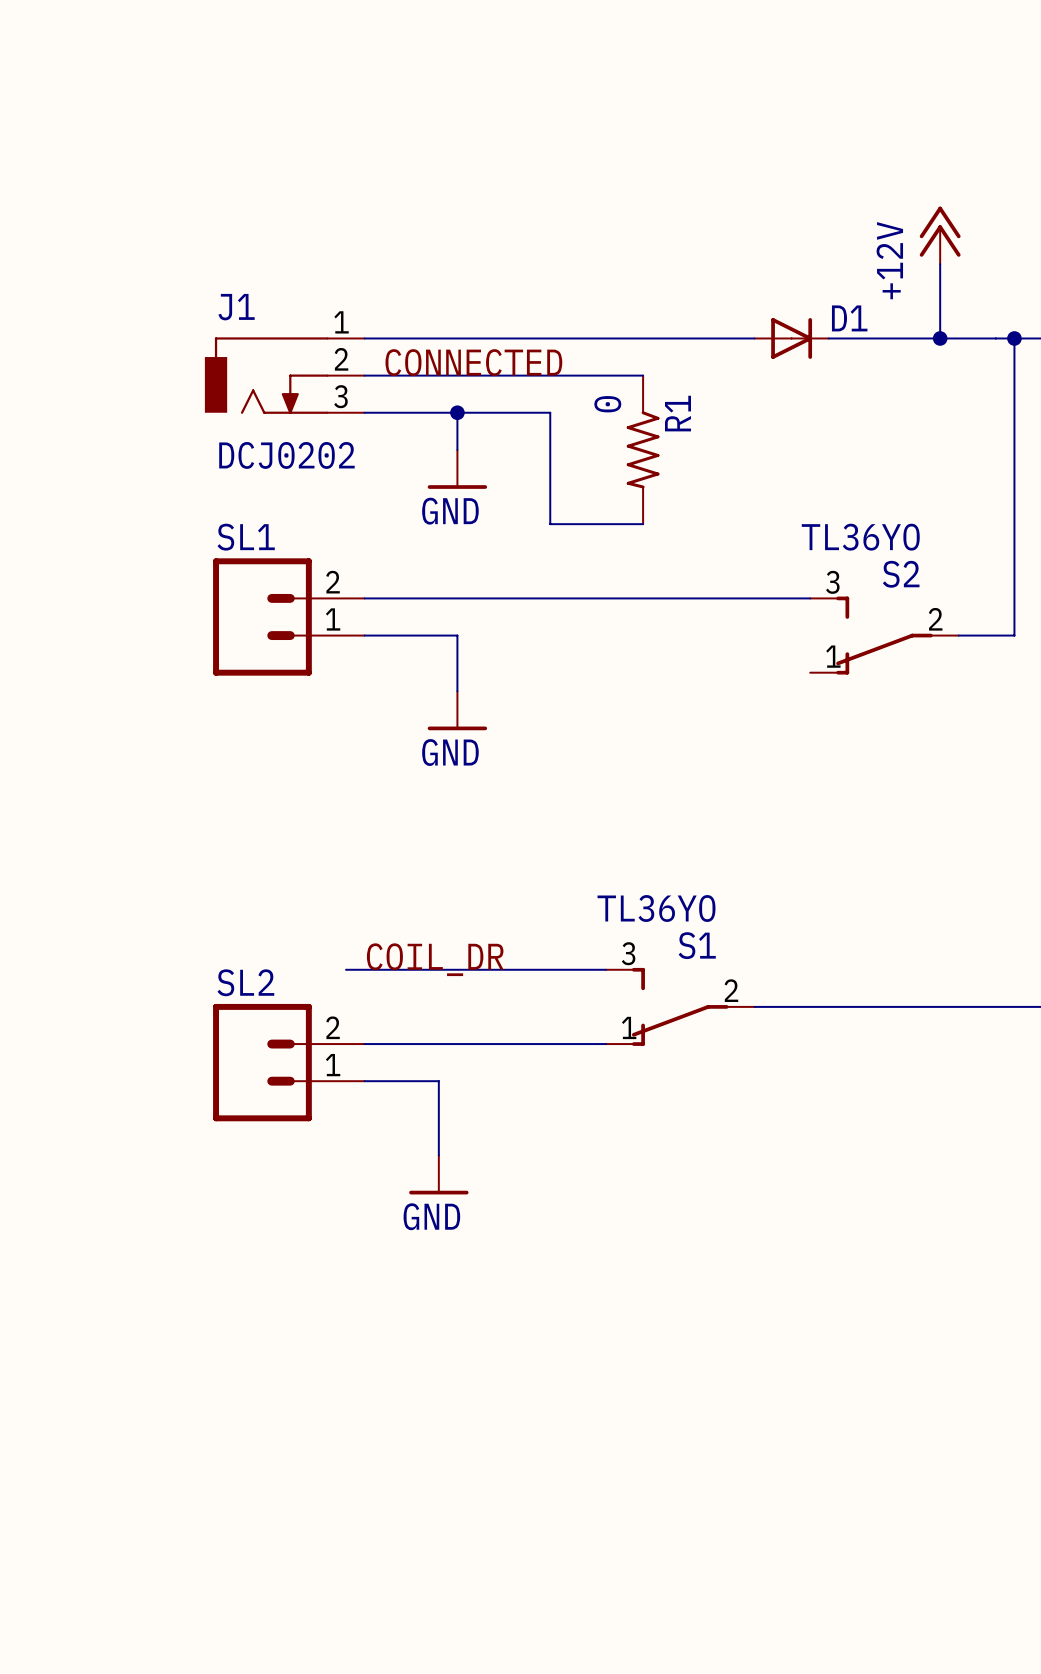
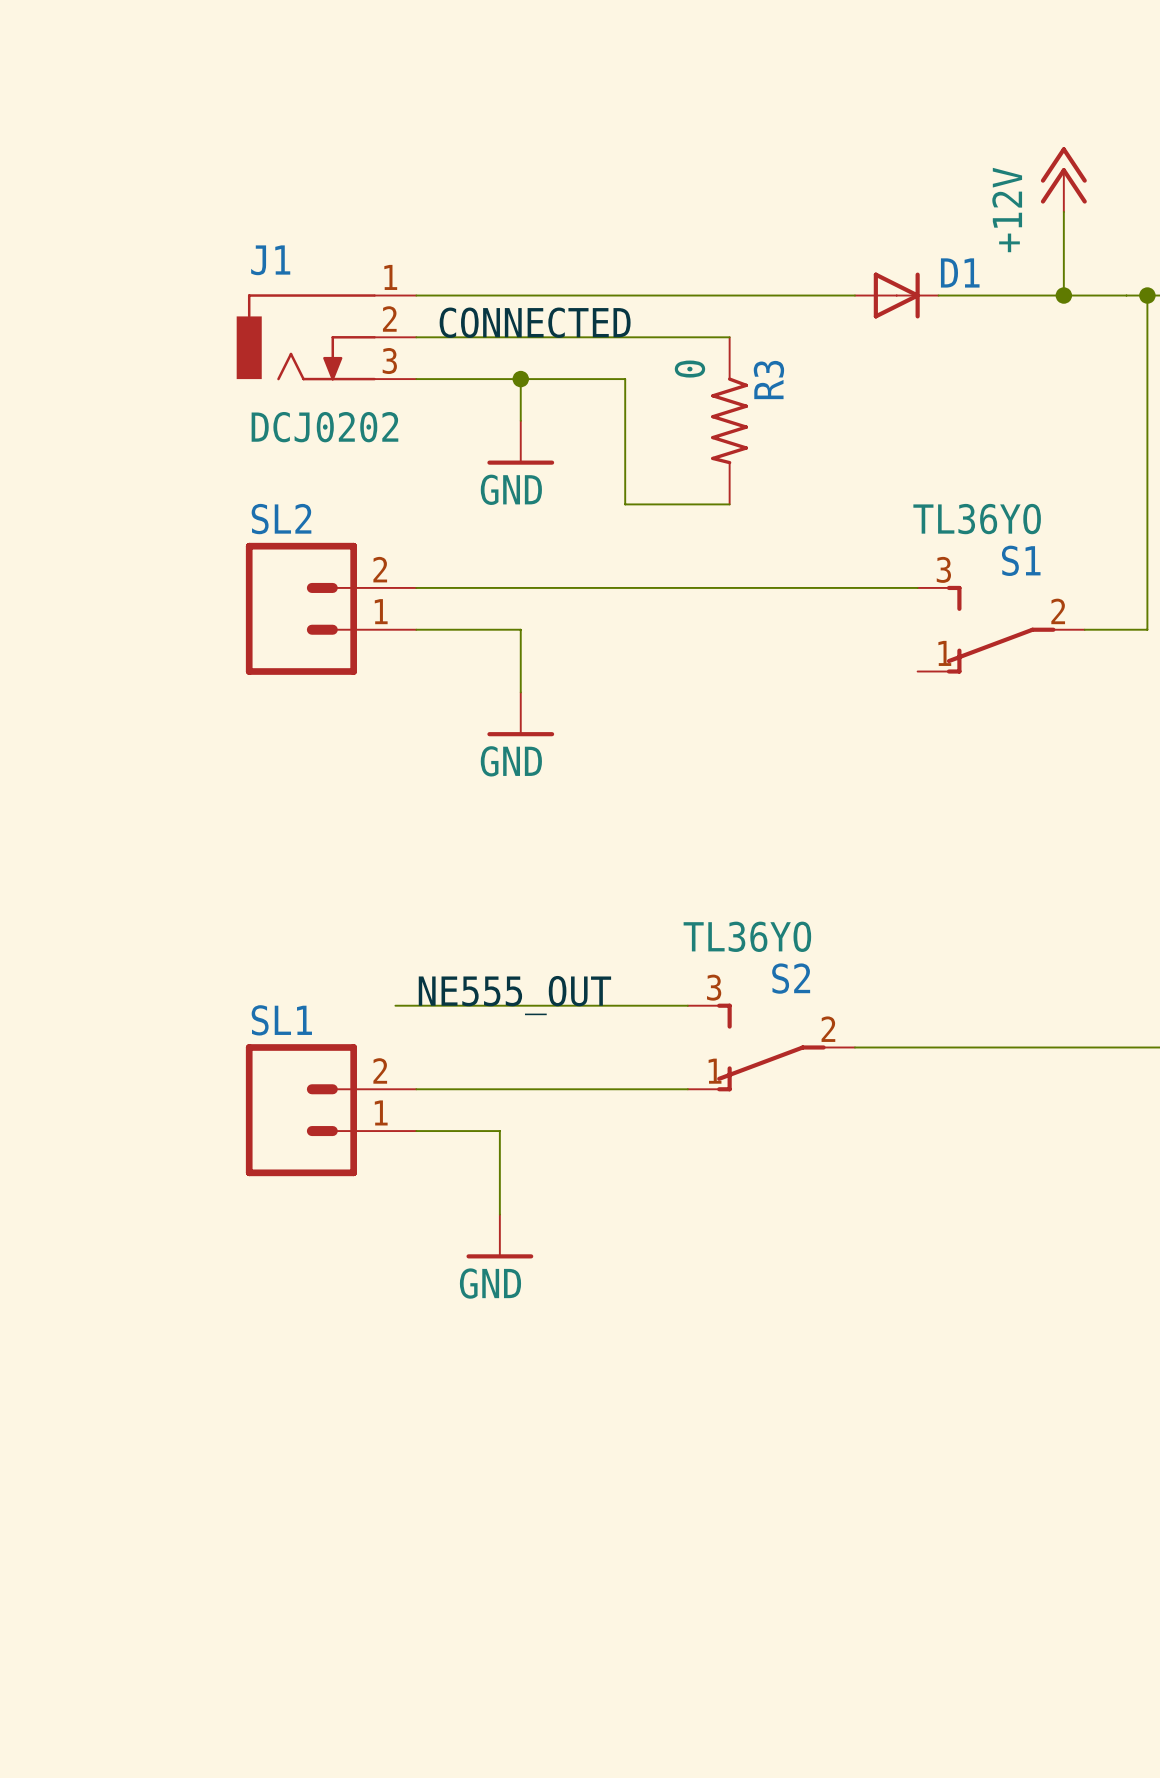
R1 name: R1 (678, 413) -> R3 (768, 380)
SL1 name: SL1 (246, 537) -> SL2 (281, 519)
S2 name: S2 (901, 574) -> S1 (1021, 560)
S1 name: S1 (697, 945) -> S2 (791, 978)
label: COIL_DR (435, 959) -> NE555_OUT (514, 995)
SL2 name: SL2 (245, 982) -> SL1 (281, 1020)

